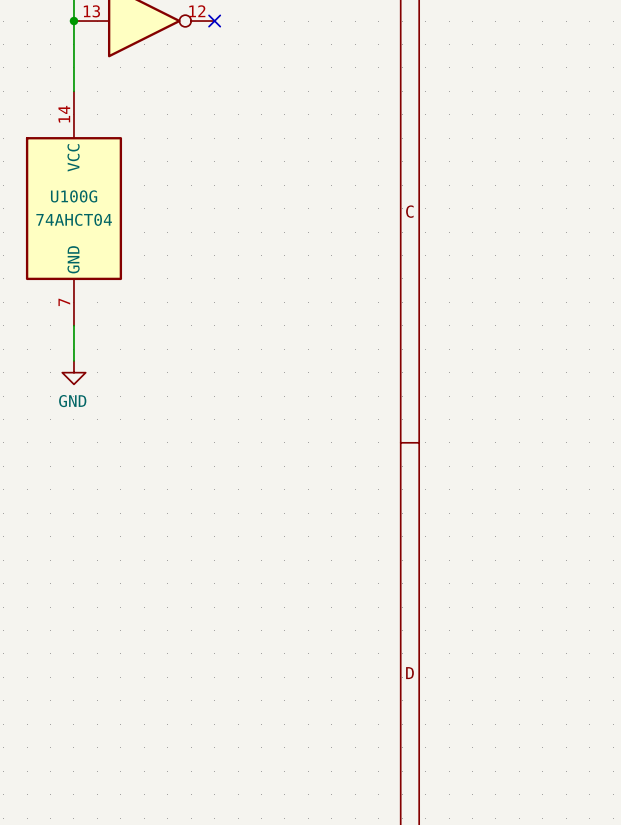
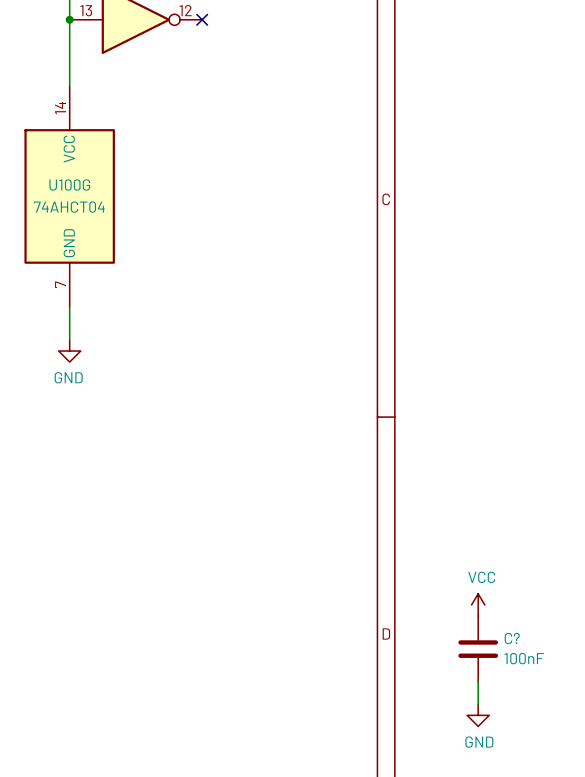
power symbol: none -> VCC (478, 604)
C?: none -> 100nF (478, 649)
wire: none -> (478, 682) (478, 704)
power symbol: none -> GND (478, 715)

